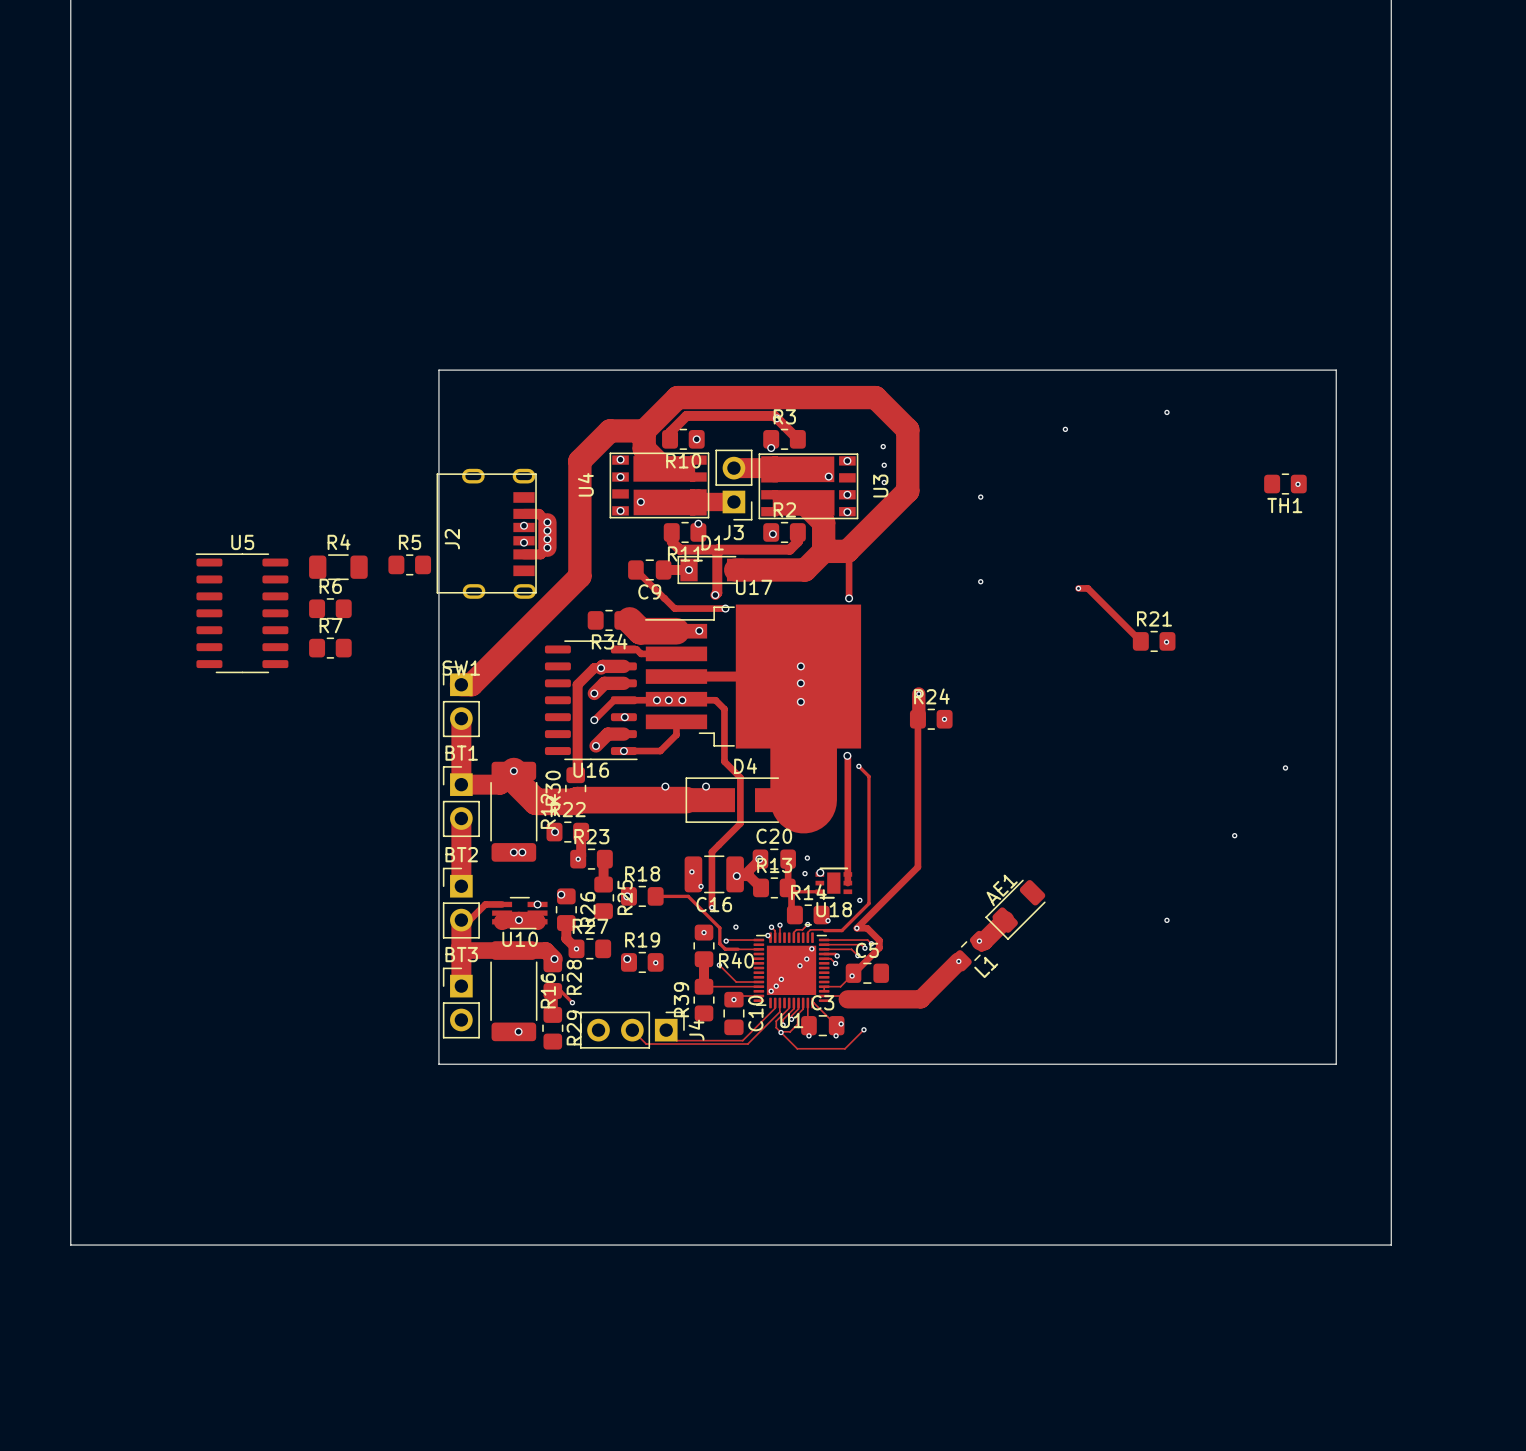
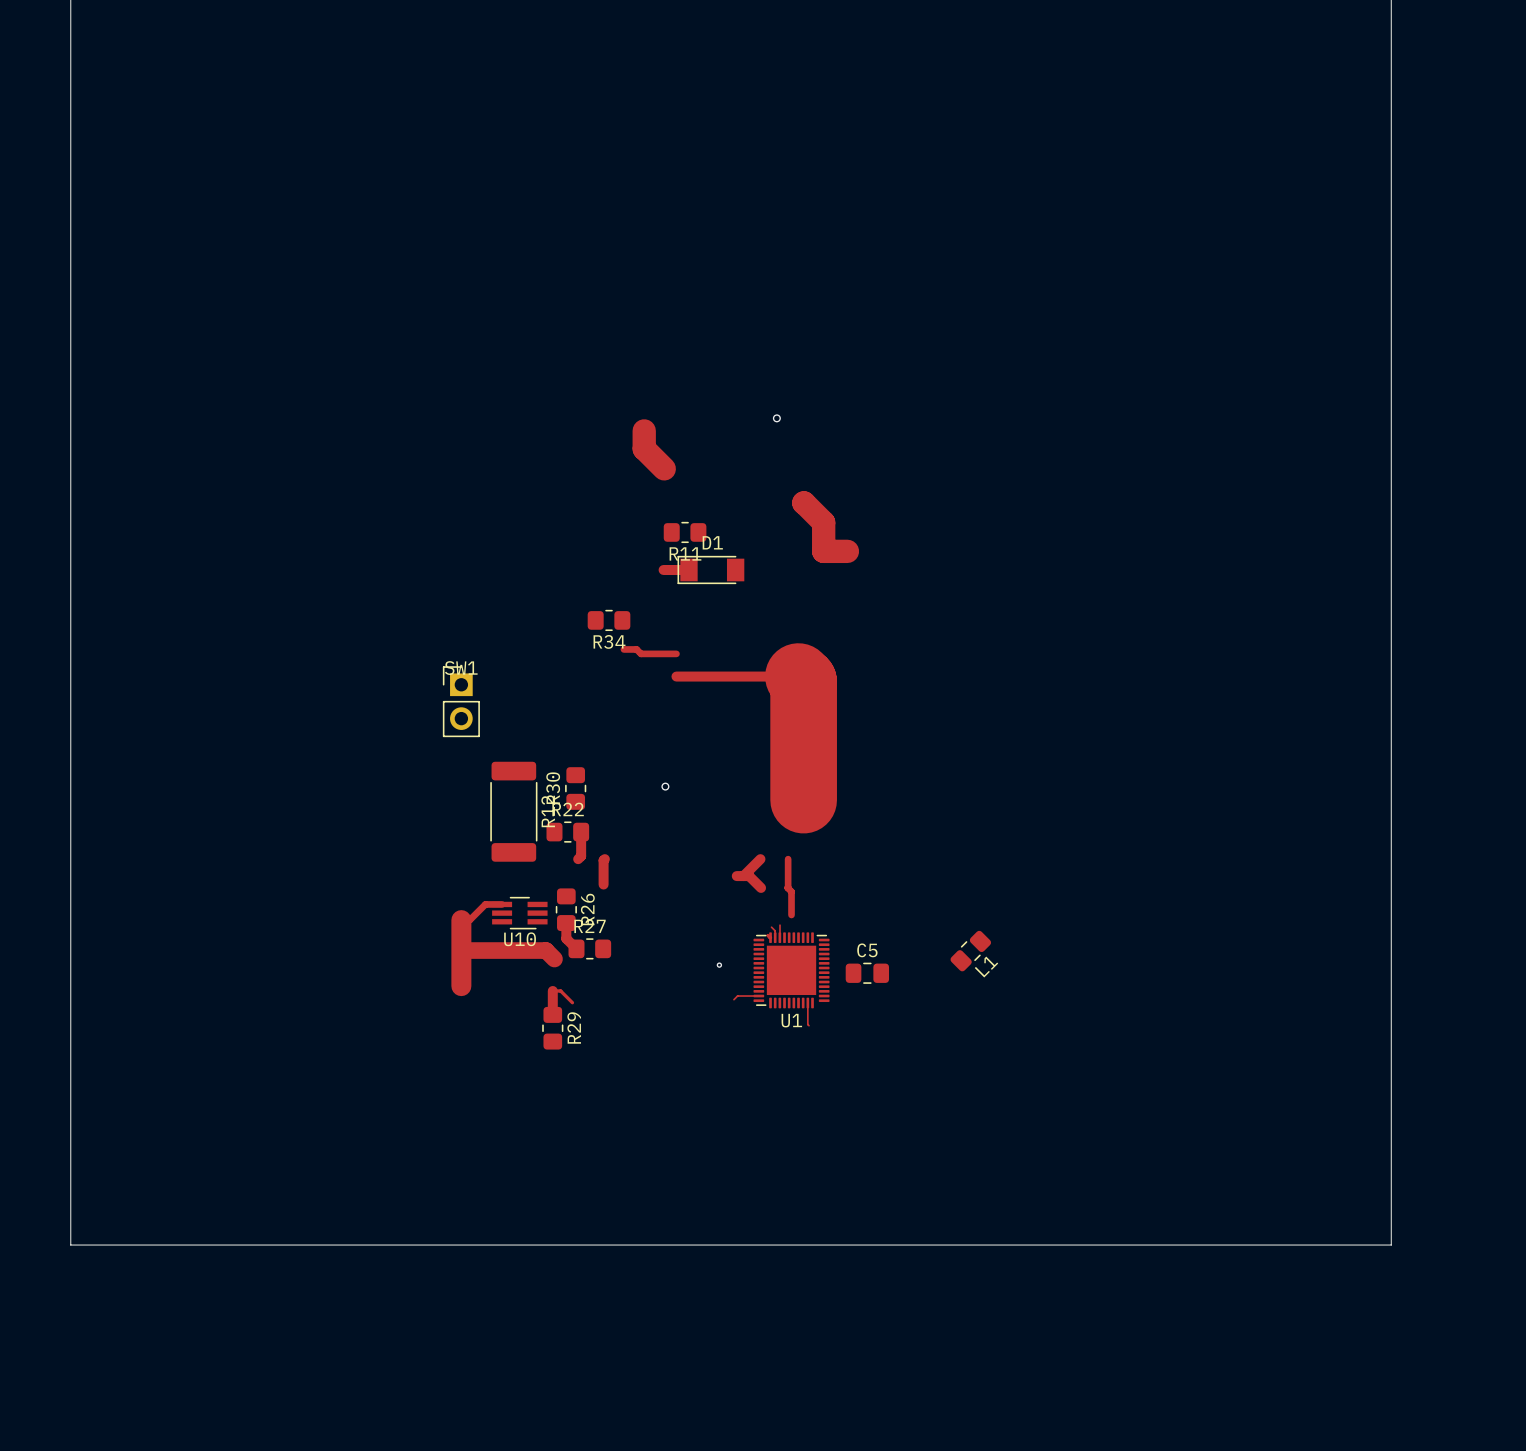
board edge: (438, 370) (438, 1064) (1336, 1064) (1336, 370) (438, 370) -> none
via: (1166, 412) -> none
via: (1065, 429) -> none
track: (670, 439) (670, 432) (686, 415) (774, 415) (797, 439) -> none
R10: (683, 439) -> none
via: (696, 439) -> none
R3: (784, 439) -> none
via: (883, 446) -> none
via: (771, 448) -> none
via: (620, 459) -> none
via: (847, 460) -> none
via: (884, 465) -> none
track: (733, 468) (769, 468) -> none
via: (828, 476) -> none
via: (620, 477) -> none
via: (884, 482) -> none
TH1: (1285, 484) -> none
via: (1297, 484) -> none
U4: (659, 485) -> none
J3: (733, 485) -> none
U3: (808, 486) -> none
track: (698, 493) (698, 501) (733, 501) -> none
via: (847, 494) -> none
via: (980, 497) -> none
via: (640, 501) -> none
via: (620, 510) -> none
via: (847, 512) -> none
track: (524, 513) (538, 513) (547, 522) (547, 547) (540, 554) (524, 554) -> none
via: (547, 522) -> none
via: (698, 523) -> none
via: (524, 525) -> none
via: (547, 530) -> none
track: (671, 532) (671, 541) (679, 549) (789, 549) (797, 541) (797, 532) -> none
R2: (784, 532) -> none
J2: (486, 533) -> none
via: (772, 534) -> none
via: (547, 539) -> none
via: (524, 542) -> none
via: (547, 547) -> none
track: (717, 549) (717, 593) (715, 595) -> none
track: (823, 551) (805, 569) (735, 569) -> none
R5: (409, 564) -> none
R4: (338, 567) -> none
track: (635, 569) (664, 598) -> none
C9: (649, 569) -> none
via: (688, 569) -> none
via: (980, 581) -> none
track: (1078, 588) (1087, 588) (1140, 641) -> none
via: (1078, 588) -> none
via: (715, 595) -> none
track: (664, 598) (674, 608) (725, 608) -> none
track: (849, 598) (849, 553) (847, 551) (907, 490) (907, 429) (875, 397) (677, 397) (644, 430) (610, 430) (579, 461) (579, 576) (471, 684) (461, 684) -> none
via: (849, 598) -> none
R6: (330, 608) -> none
via: (725, 608) -> none
U5: (242, 613) -> none
track: (629, 620) (640, 631) (699, 630) -> none
via: (699, 630) -> none
R21: (1154, 641) -> none
via: (1166, 642) -> none
R7: (330, 648) -> none
track: (623, 666) (594, 668) (577, 684) (577, 773) (575, 775) -> none
via: (800, 666) -> none
via: (601, 668) -> none
U17: (753, 676) -> none
track: (623, 683) (604, 683) (594, 693) -> none
via: (800, 683) -> none
via: (594, 693) -> none
track: (918, 693) (917, 867) (856, 928) (867, 928) (879, 940) (879, 947) (850, 976) -> none
via: (918, 693) -> none
U16: (591, 700) -> none
via: (656, 700) -> none
via: (668, 700) -> none
via: (682, 700) -> none
via: (800, 701) -> none
via: (624, 717) -> none
track: (461, 718) (461, 784) (500, 784) (513, 771) (513, 779) (536, 801) (686, 800) -> none
R24: (931, 719) -> none
via: (944, 719) -> none
track: (594, 720) (614, 700) (715, 700) (724, 709) (724, 761) (740, 777) (740, 823) (711, 852) (711, 907) -> none
via: (594, 720) -> none
track: (676, 721) (676, 734) (660, 751) (623, 751) -> none
track: (623, 734) (607, 734) (596, 745) -> none
via: (596, 745) -> none
via: (623, 751) -> none
track: (847, 755) (847, 883) -> none
via: (847, 755) -> none
track: (858, 766) (868, 776) (868, 903) (841, 930) (810, 929) (807, 932) (807, 937) -> none
via: (858, 766) -> none
via: (1285, 767) -> none
via: (513, 771) -> none
via: (706, 786) -> none
D4: (743, 800) -> none
BT1: (461, 801) -> none
track: (461, 818) (461, 886) -> none
via: (555, 832) -> none
via: (1234, 835) -> none
via: (513, 852) -> none
via: (522, 852) -> none
via: (807, 858) -> none
via: (578, 859) -> none
R23: (591, 859) -> none
via: (759, 859) -> none
C20: (774, 859) -> none
via: (691, 871) -> none
via: (820, 872) -> none
via: (805, 873) -> none
C16: (714, 874) -> none
via: (736, 876) -> none
U18: (833, 883) -> none
via: (701, 886) -> none
R13: (774, 887) -> none
track: (787, 887) (791, 891) (819, 891) -> none
via: (561, 894) -> none
via: (627, 896) -> none
R18: (642, 896) -> none
track: (655, 896) (688, 896) (719, 927) (719, 943) (725, 949) (738, 949) -> none
R25: (603, 897) -> none
via: (859, 900) -> none
BT2: (461, 903) -> none
via: (537, 904) -> none
via: (711, 907) -> none
AE1: (1015, 909) -> none
R14: (808, 915) -> none
via: (518, 920) -> none
via: (828, 920) -> none
track: (1005, 920) (983, 941) (980, 941) -> none
via: (1166, 920) -> none
track: (502, 921) (503, 920) (535, 920) (537, 921) -> none
track: (807, 924) (802, 929) (796, 929) (793, 932) (793, 937) -> none
via: (807, 924) -> none
via: (780, 925) -> none
via: (735, 927) -> none
via: (771, 927) -> none
via: (856, 928) -> none
via: (704, 932) -> none
via: (767, 935) -> none
track: (758, 940) (726, 941) -> none
track: (824, 940) (867, 940) (871, 943) -> none
via: (726, 941) -> none
via: (979, 941) -> none
via: (871, 943) -> none
track: (824, 944) (861, 944) (864, 948) -> none
R40: (704, 945) -> none
via: (576, 948) -> none
via: (811, 948) -> none
via: (864, 948) -> none
track: (738, 949) (758, 949) -> none
track: (824, 949) (851, 949) (857, 955) -> none
track: (824, 954) (835, 954) (837, 955) -> none
via: (837, 955) -> none
via: (857, 955) -> none
track: (824, 958) (830, 958) (835, 963) -> none
via: (554, 959) -> none
via: (627, 959) -> none
via: (806, 959) -> none
track: (701, 960) (704, 963) (704, 986) (758, 986) -> none
track: (958, 961) (920, 999) (847, 999) (844, 996) (824, 996) -> none
via: (958, 961) -> none
R19: (642, 962) -> none
via: (655, 962) -> none
via: (835, 963) -> none
track: (719, 965) (736, 982) (758, 982) -> none
via: (799, 965) -> none
via: (852, 975) -> none
track: (850, 976) (840, 986) (824, 986) (824, 991) -> none
R28: (552, 977) -> none
via: (781, 979) -> none
via: (776, 986) -> none
R16: (513, 991) -> none
via: (771, 991) -> none
via: (733, 999) -> none
R39: (704, 1000) -> none
via: (572, 1002) -> none
BT3: (461, 1003) -> none
track: (775, 1003) (775, 1008) (742, 1040) (676, 1040) (666, 1030) -> none
track: (779, 1003) (779, 1012) (747, 1044) (646, 1044) (632, 1030) -> none
track: (789, 1003) (789, 1008) (776, 1021) (776, 1027) (797, 1048) (845, 1048) (863, 1029) -> none
track: (793, 1003) (793, 1008) (783, 1019) (783, 1025) -> none
track: (798, 1003) (798, 1008) (791, 1015) (791, 1019) -> none
track: (803, 1003) (803, 1009) (797, 1014) (797, 1024) (790, 1031) (780, 1031) -> none
track: (812, 1003) (836, 1025) -> none
C10: (733, 1013) -> none
via: (791, 1019) -> none
via: (841, 1023) -> none
via: (783, 1025) -> none
C3: (822, 1025) -> none
via: (863, 1029) -> none
J4: (632, 1030) -> none
via: (518, 1031) -> none
via: (781, 1032) -> none
via: (808, 1035) -> none
via: (836, 1035) -> none

